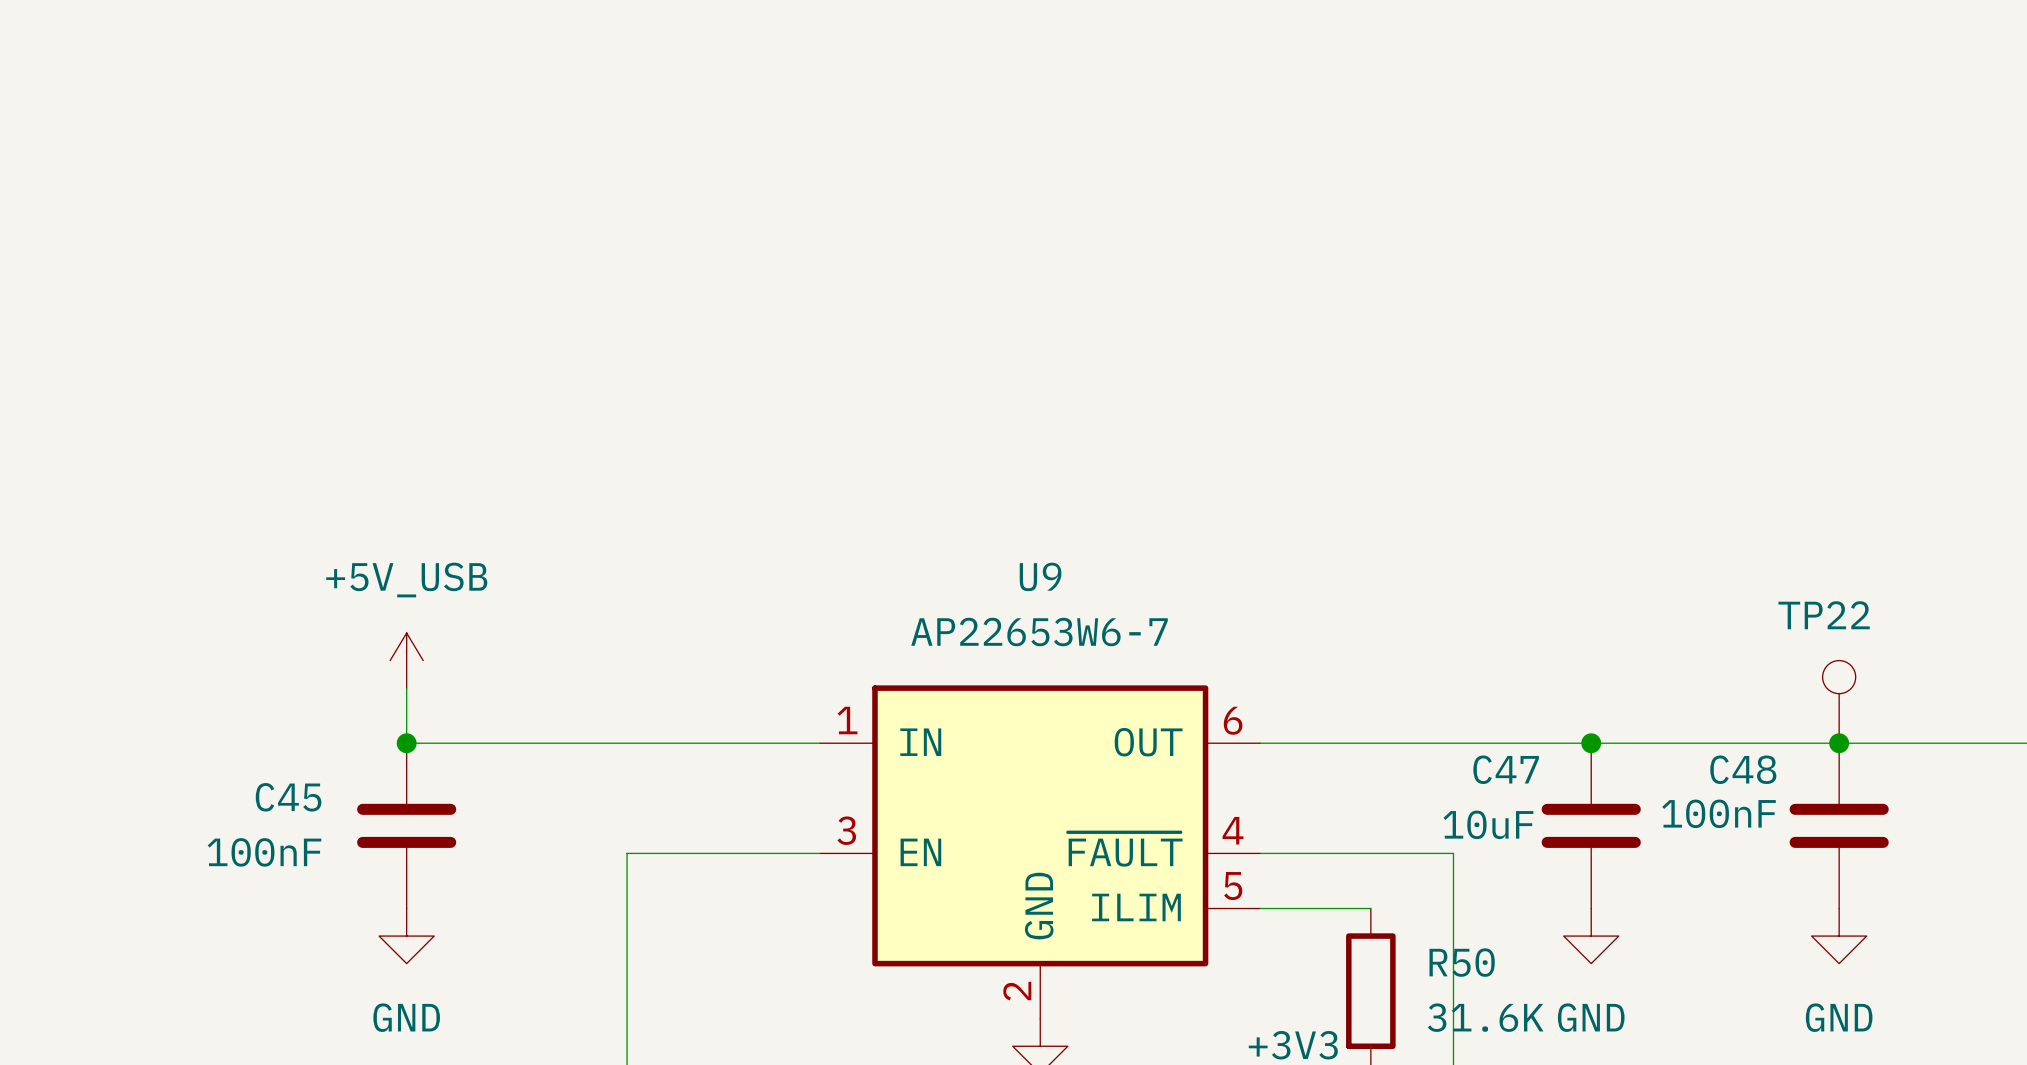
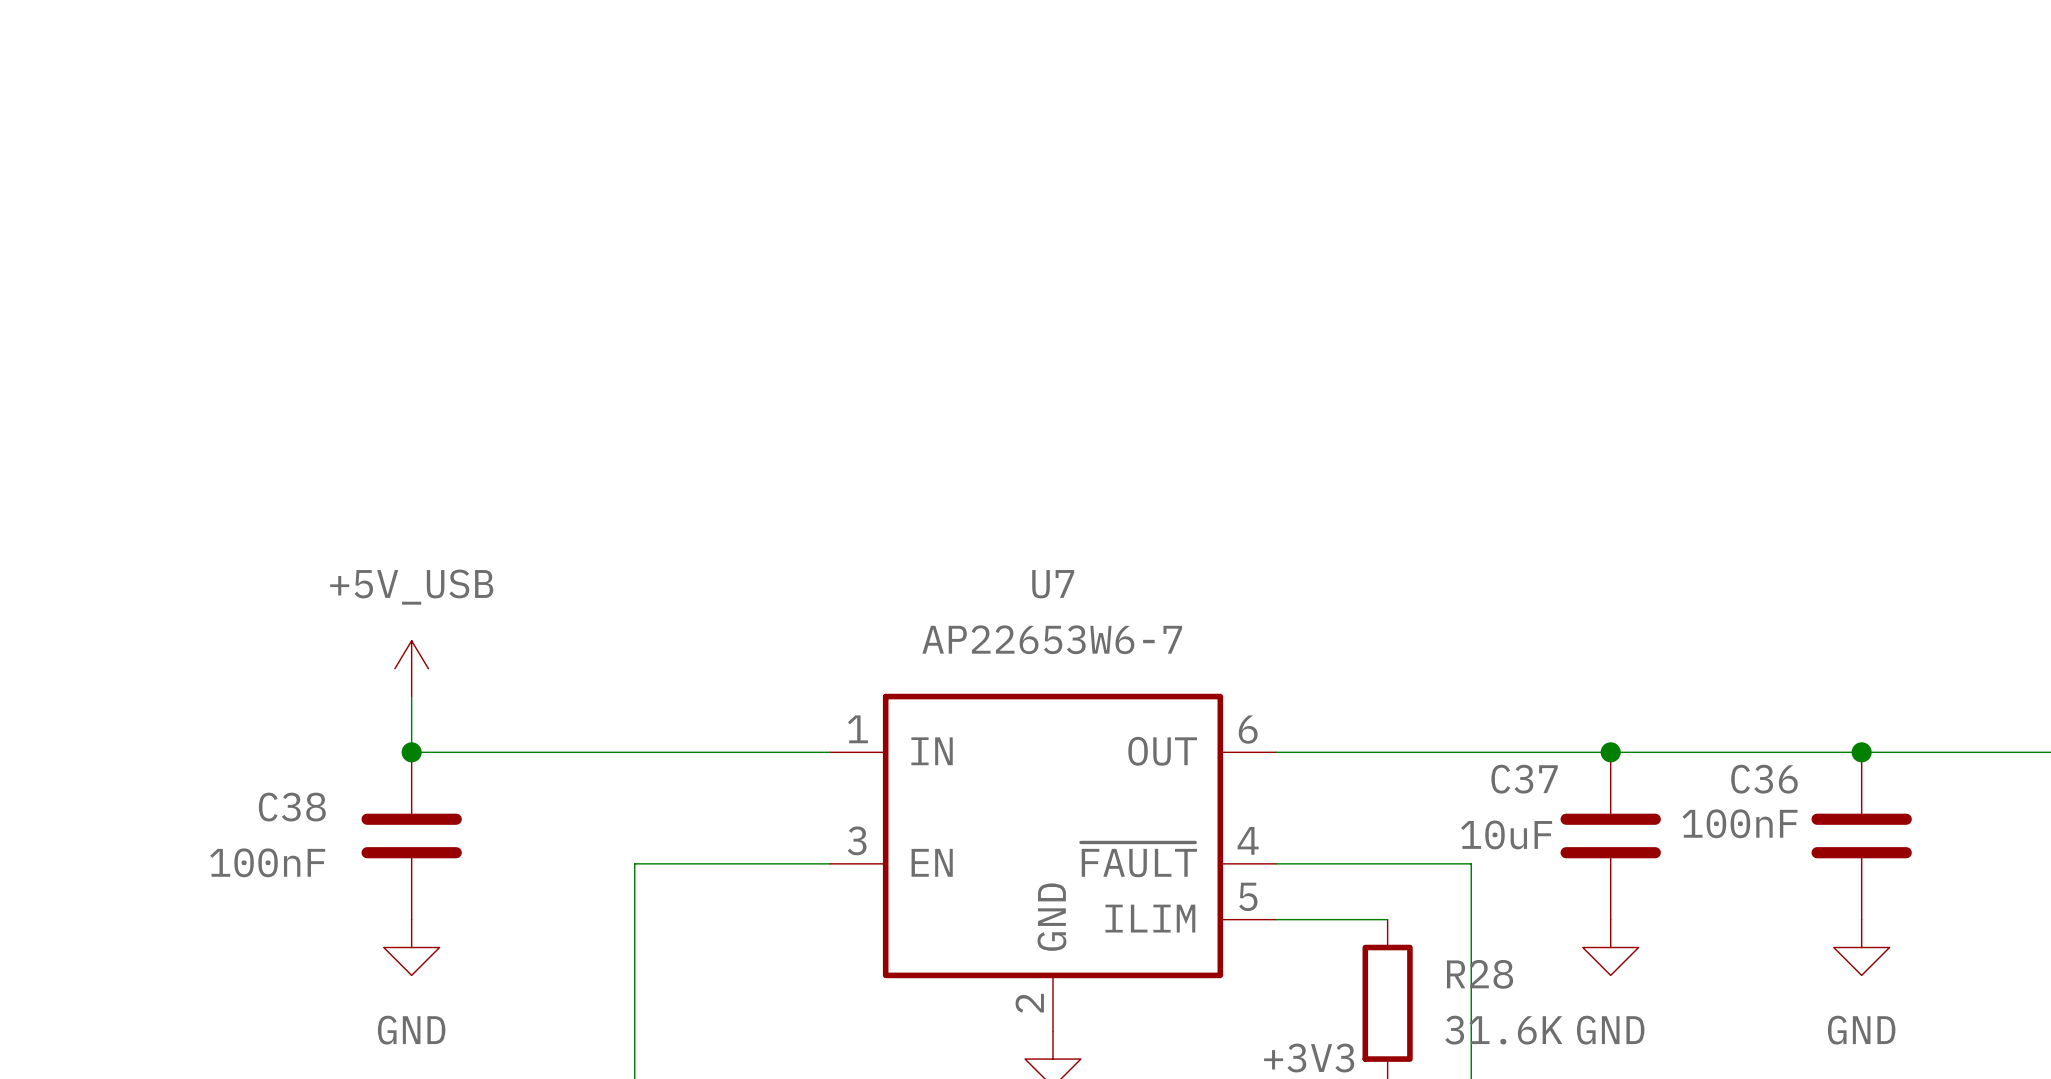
U9 name: U9 (1040, 576) -> U7 (1053, 584)
TP22: (1839, 701) -> none
C47 name: C47 (1506, 769) -> C37 (1524, 779)
C48 name: C48 (1743, 769) -> C36 (1764, 779)
C45 name: C45 (288, 797) -> C38 (292, 807)
R50 name: R50 (1462, 962) -> R28 (1480, 974)

